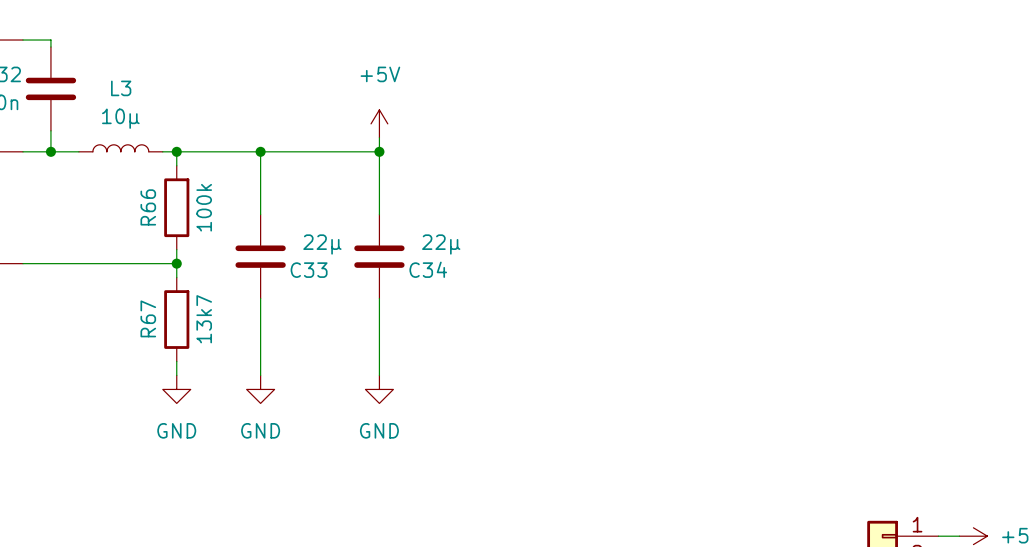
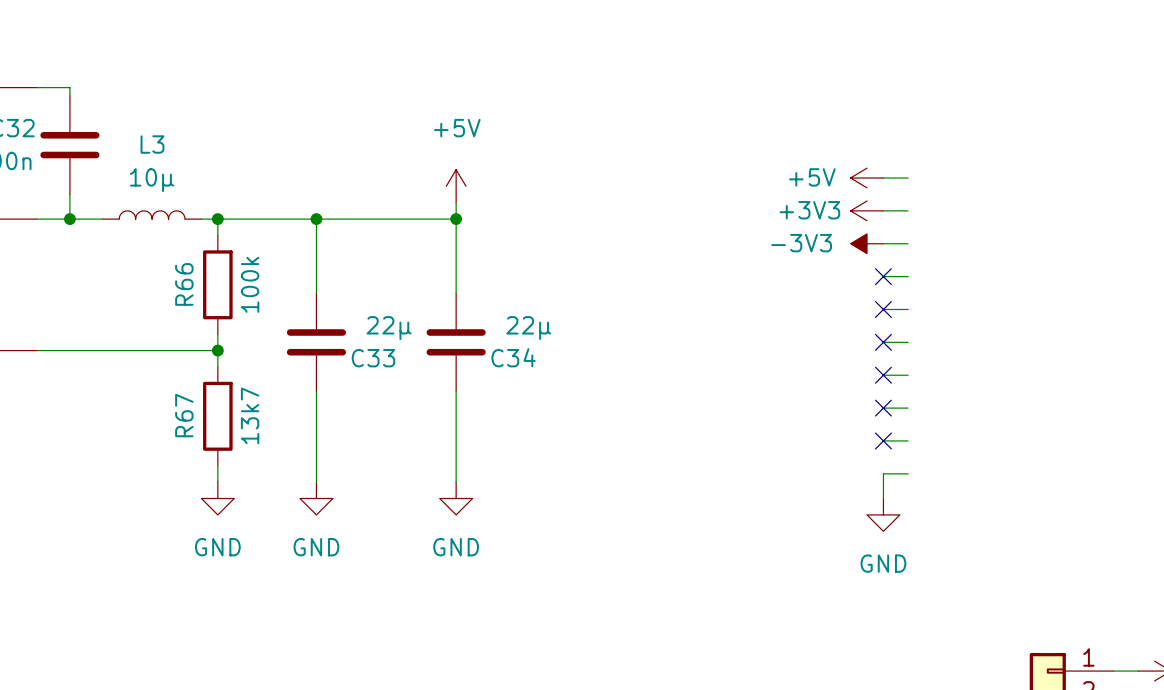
power symbol: none -> +5V (867, 178)
wire: none -> (883, 178) (908, 178)
power symbol: none -> +3V3 (867, 210)
wire: none -> (883, 210) (908, 210)
power symbol: none -> -3V3 (867, 243)
wire: none -> (883, 243) (908, 243)
wire: none -> (883, 276) (908, 276)
no-connect mark: none -> (883, 276)
wire: none -> (883, 309) (908, 309)
no-connect mark: none -> (883, 309)
wire: none -> (883, 342) (908, 342)
no-connect mark: none -> (883, 342)
wire: none -> (883, 375) (908, 375)
no-connect mark: none -> (883, 375)
wire: none -> (883, 408) (908, 408)
no-connect mark: none -> (883, 408)
wire: none -> (883, 440) (908, 440)
no-connect mark: none -> (883, 440)
wire: none -> (908, 473) (883, 473) (883, 498)
power symbol: none -> GND (883, 514)

